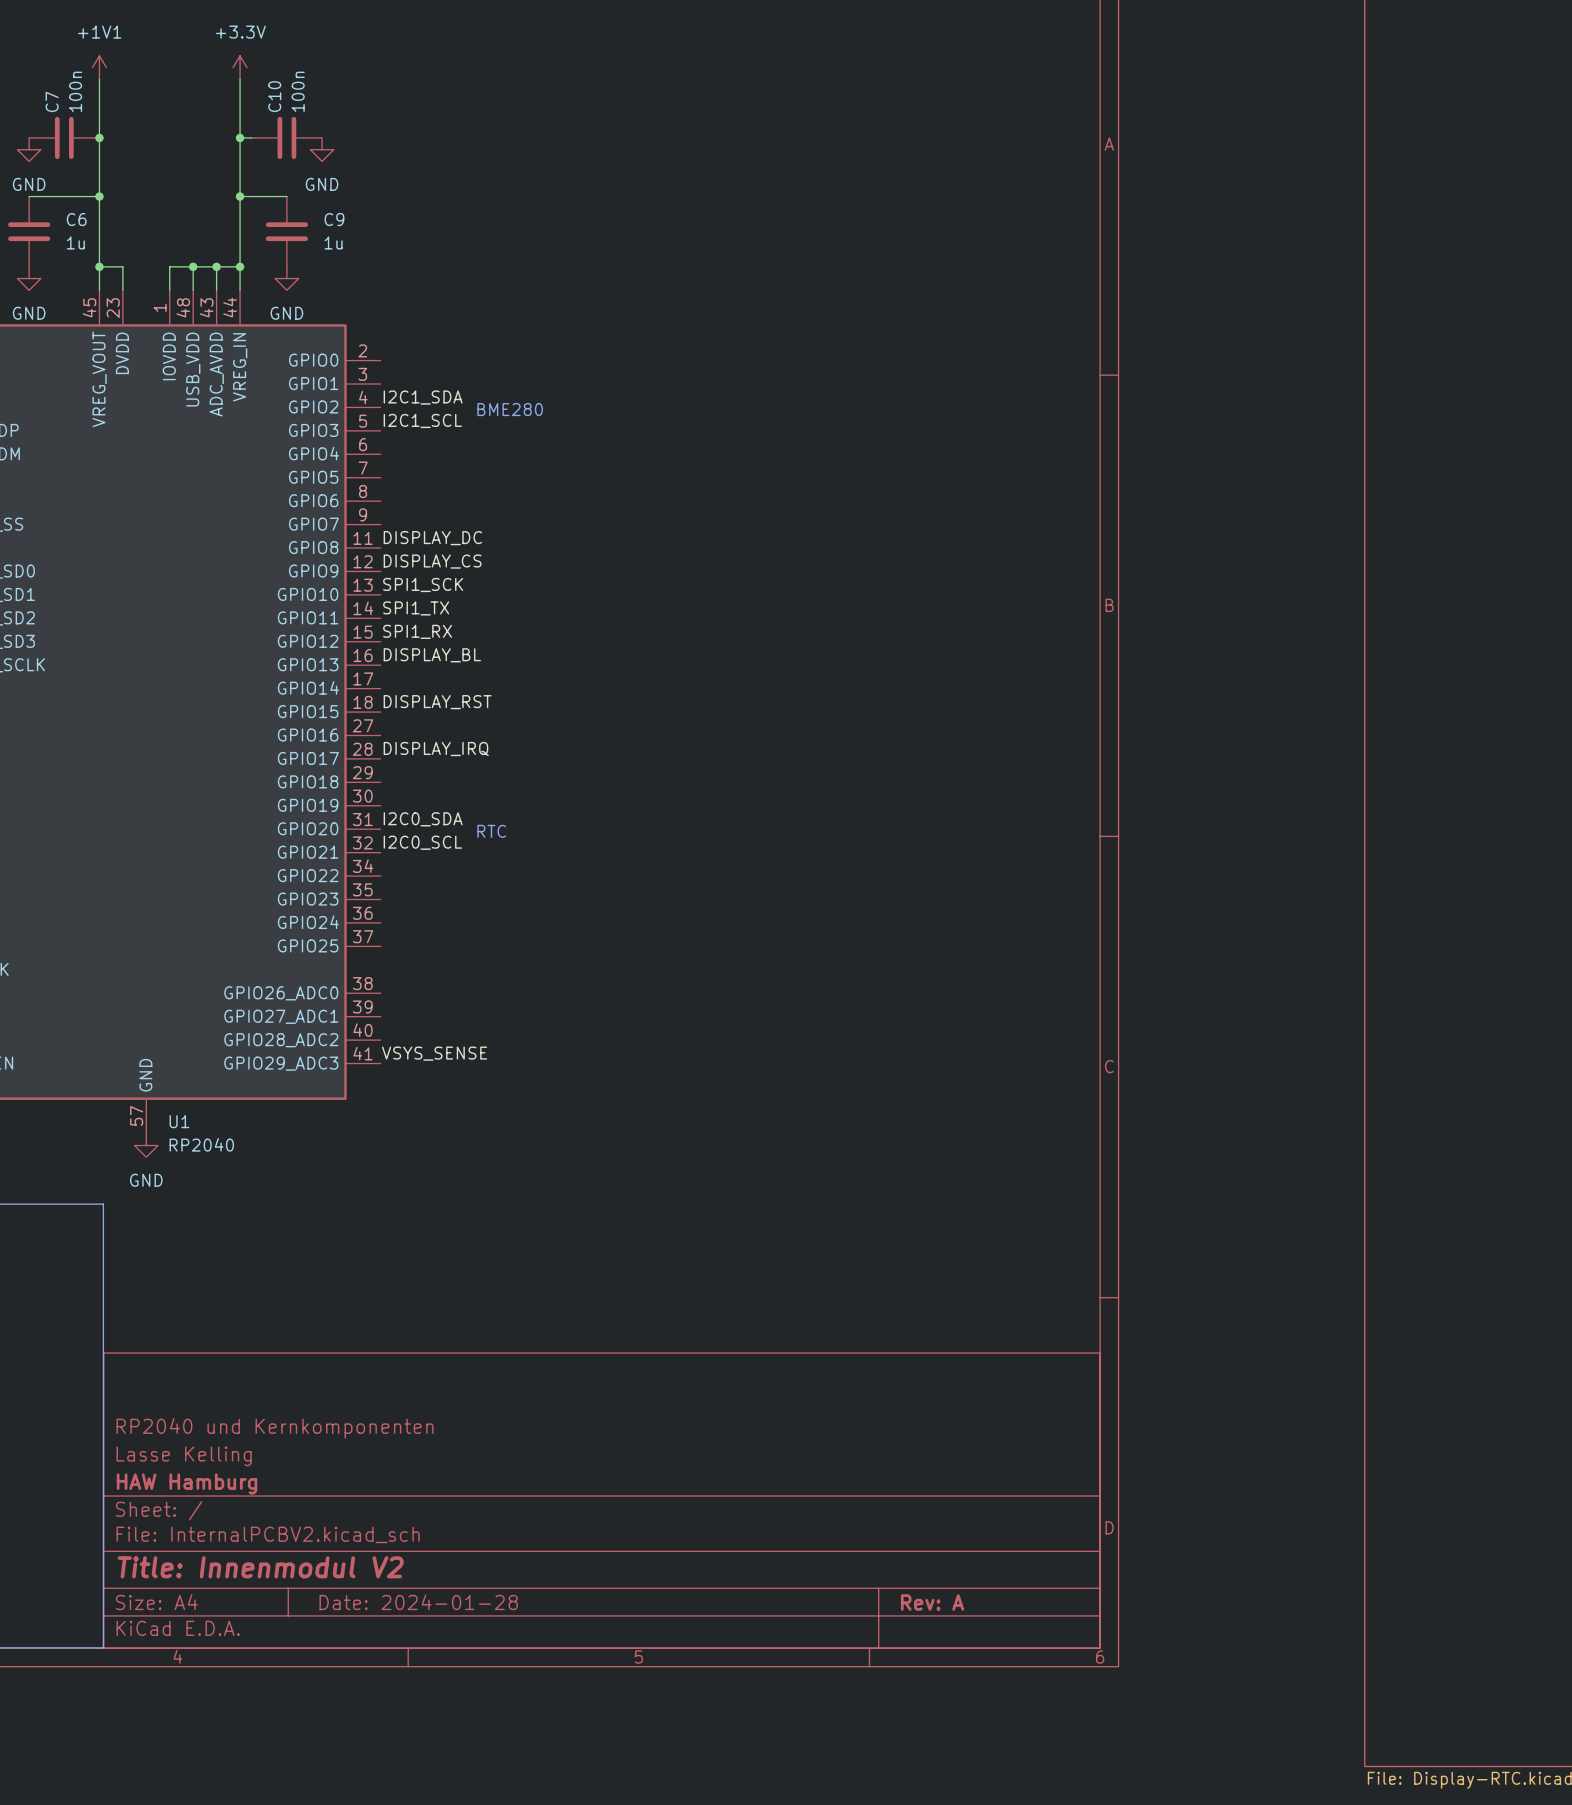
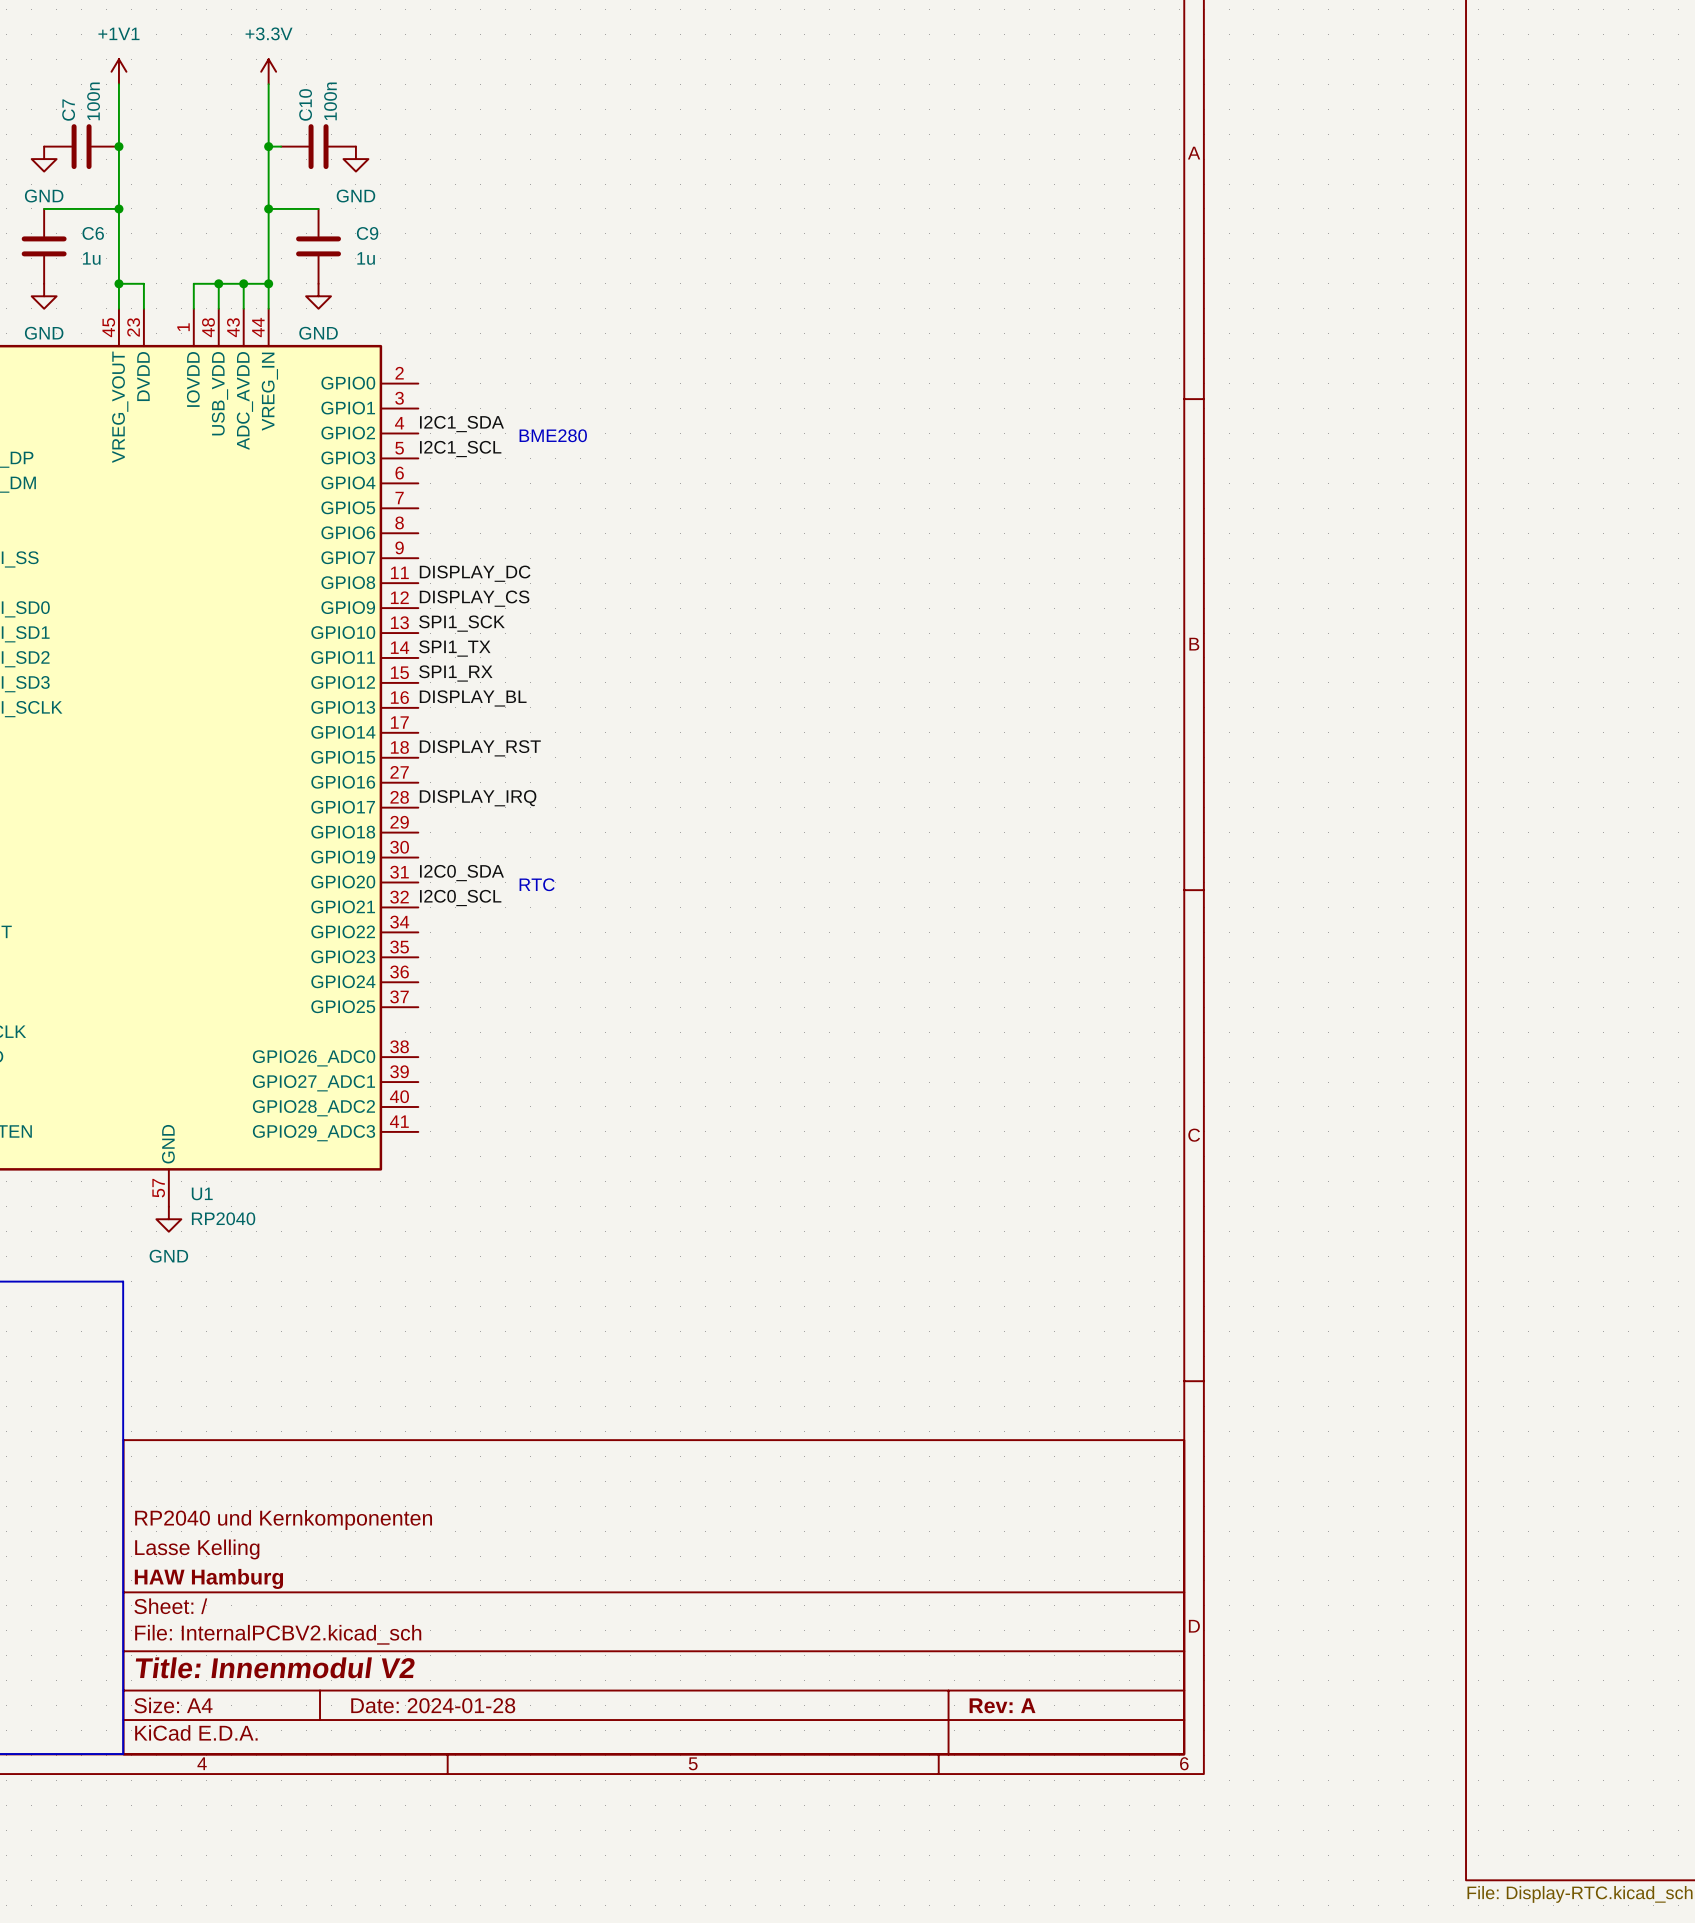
label: VSYS_SENSE (434, 1053) -> none

